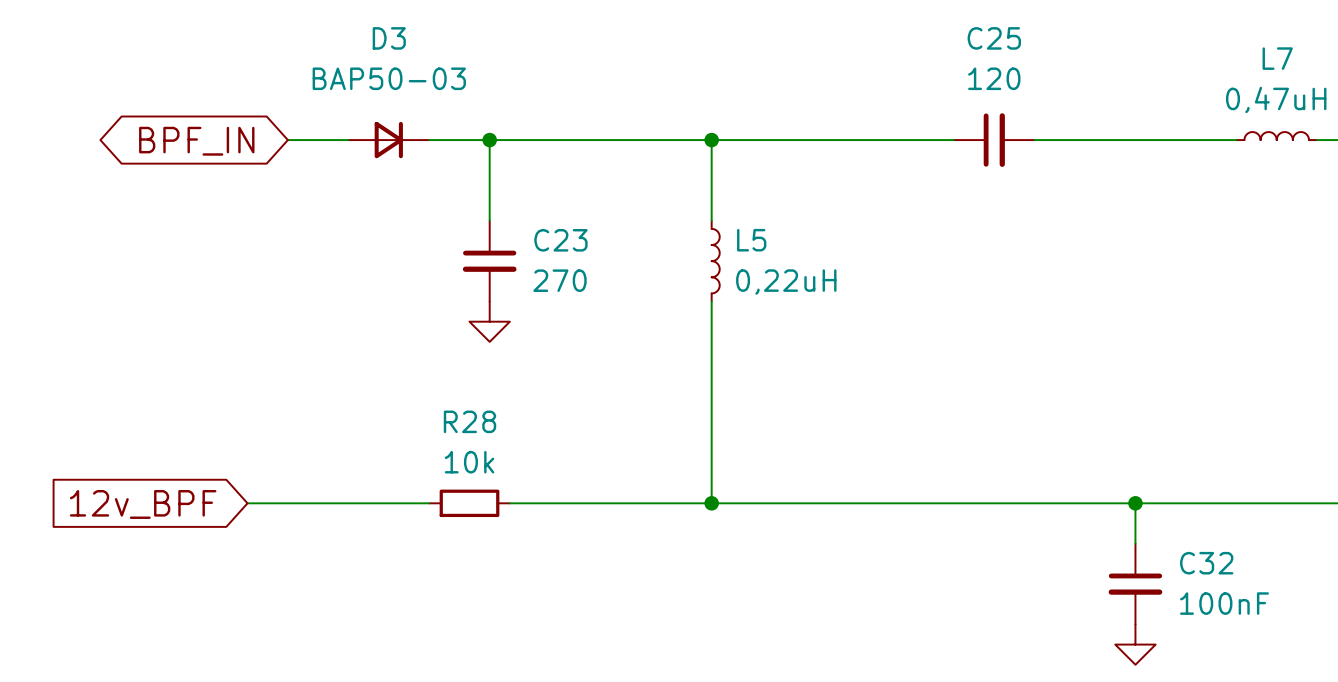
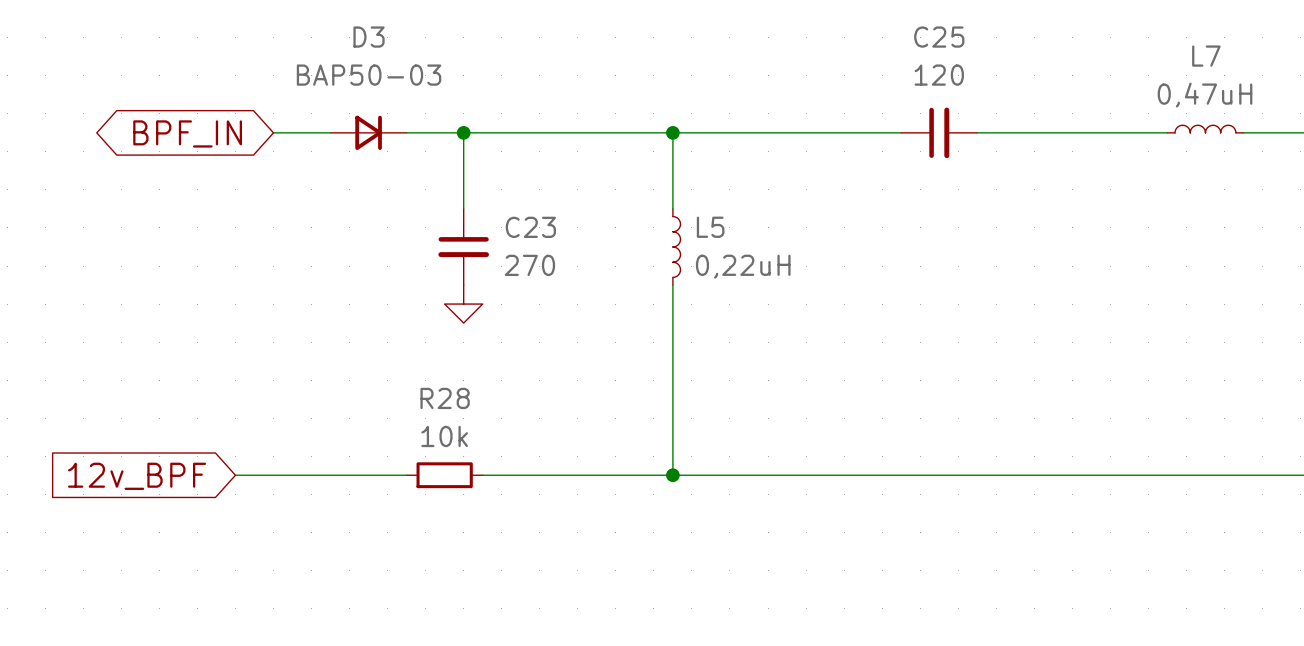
wire: (1135, 503) (1135, 543) -> none
junction: (1135, 503) -> none
C32: 100nF (1135, 584) -> none
power symbol: (1135, 644) -> none

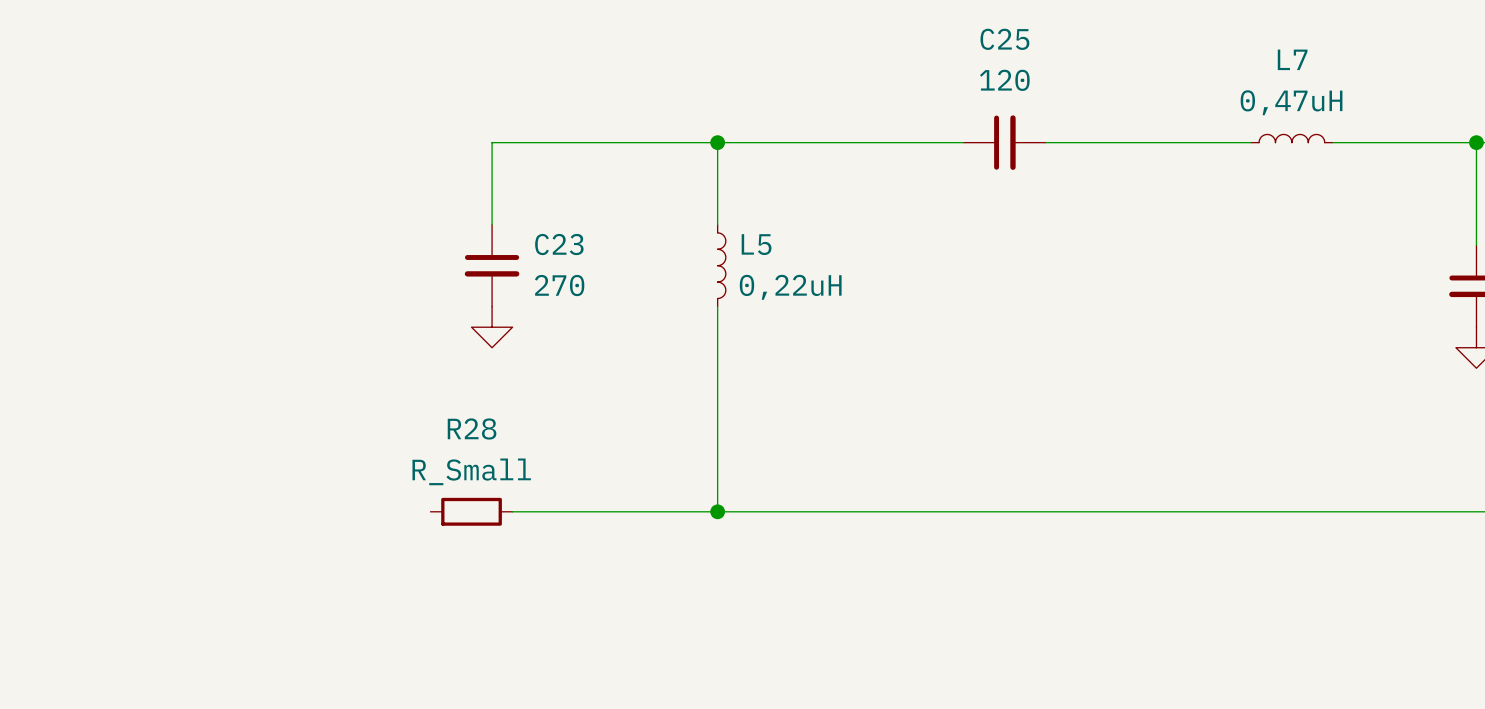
wire: (273, 132) (330, 132) -> none
D3: BAP50-03 (368, 132) -> none
wire: (406, 132) (463, 132) -> none
junction: (463, 132) -> none
global label: BPF_IN (187, 133) -> none
R28 value: 10k (444, 436) -> R_Small (471, 471)
wire: (235, 475) (406, 475) -> none
global label: 12v_BPF (137, 476) -> none

